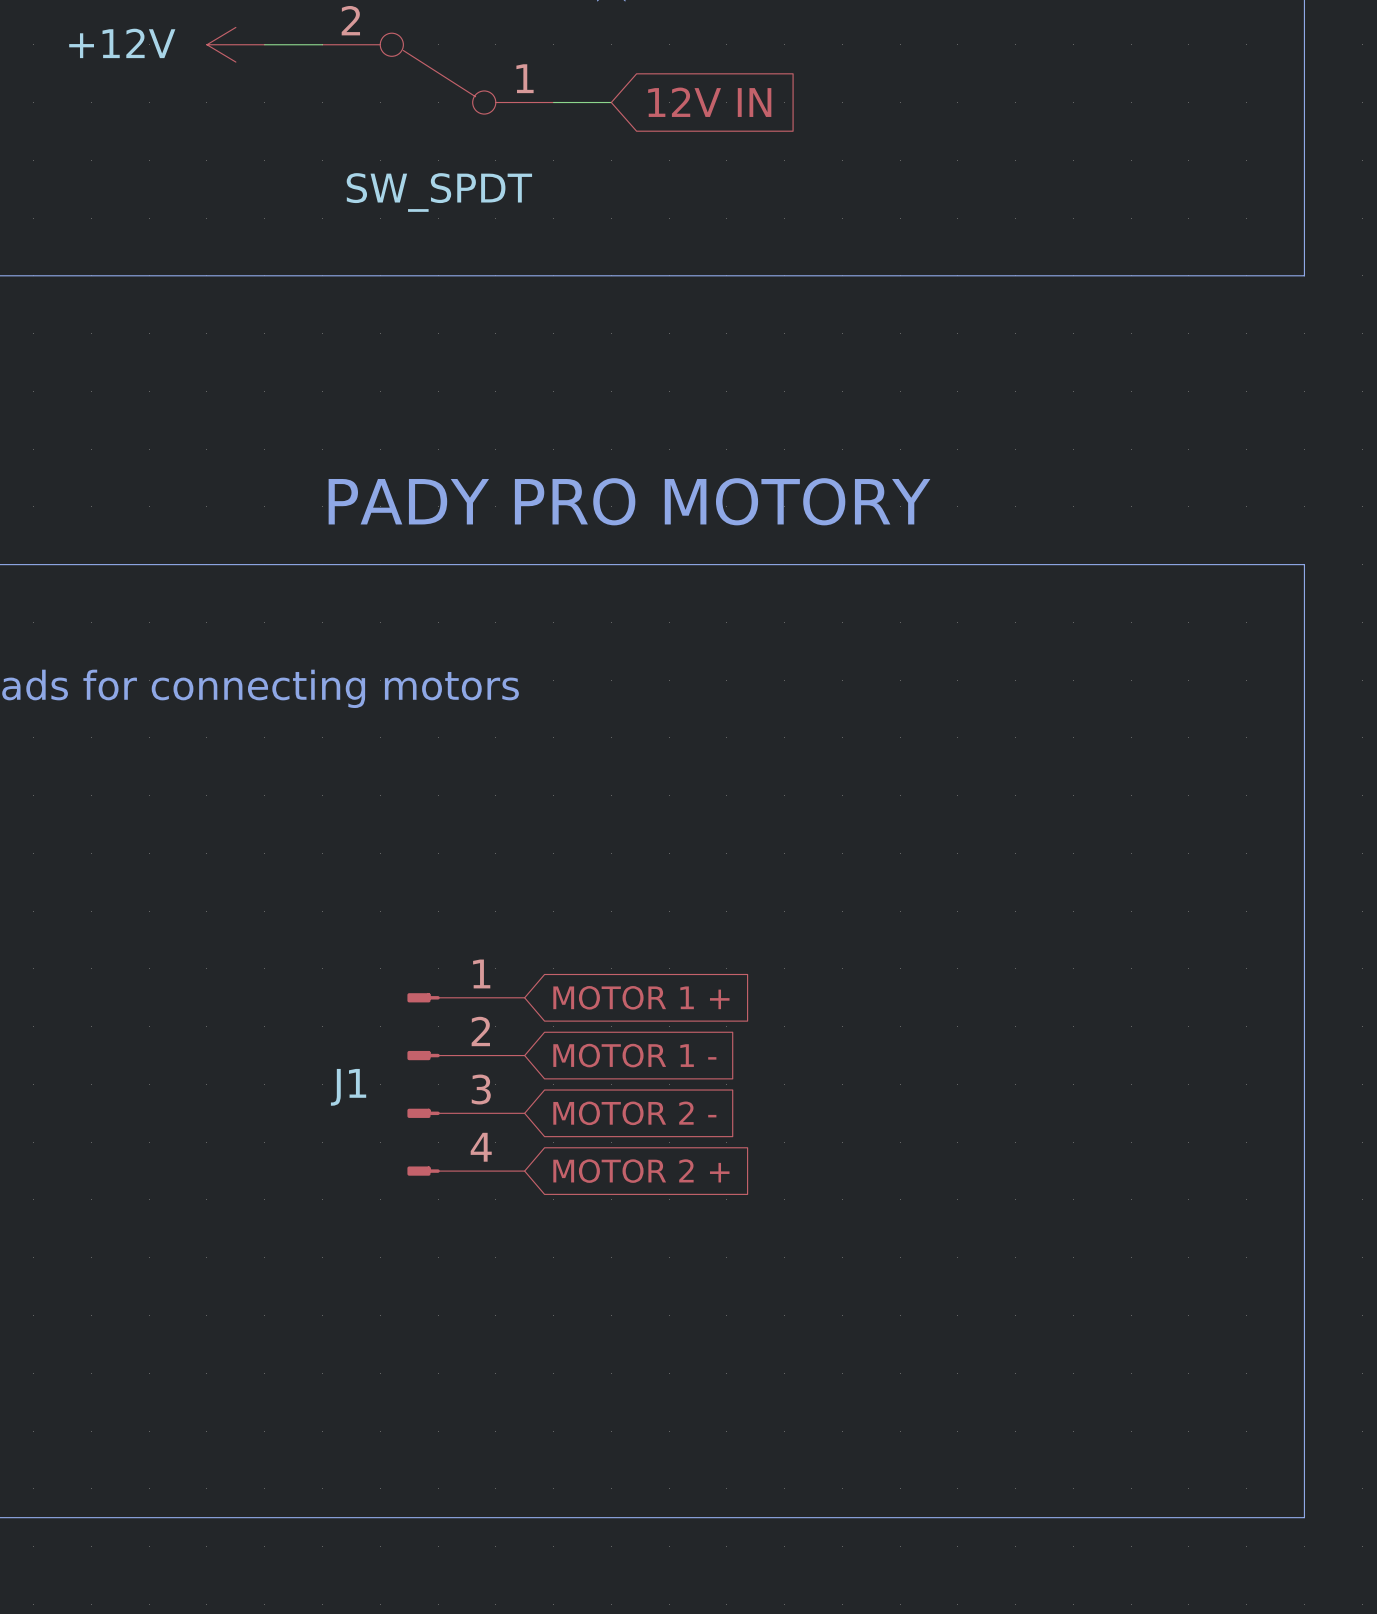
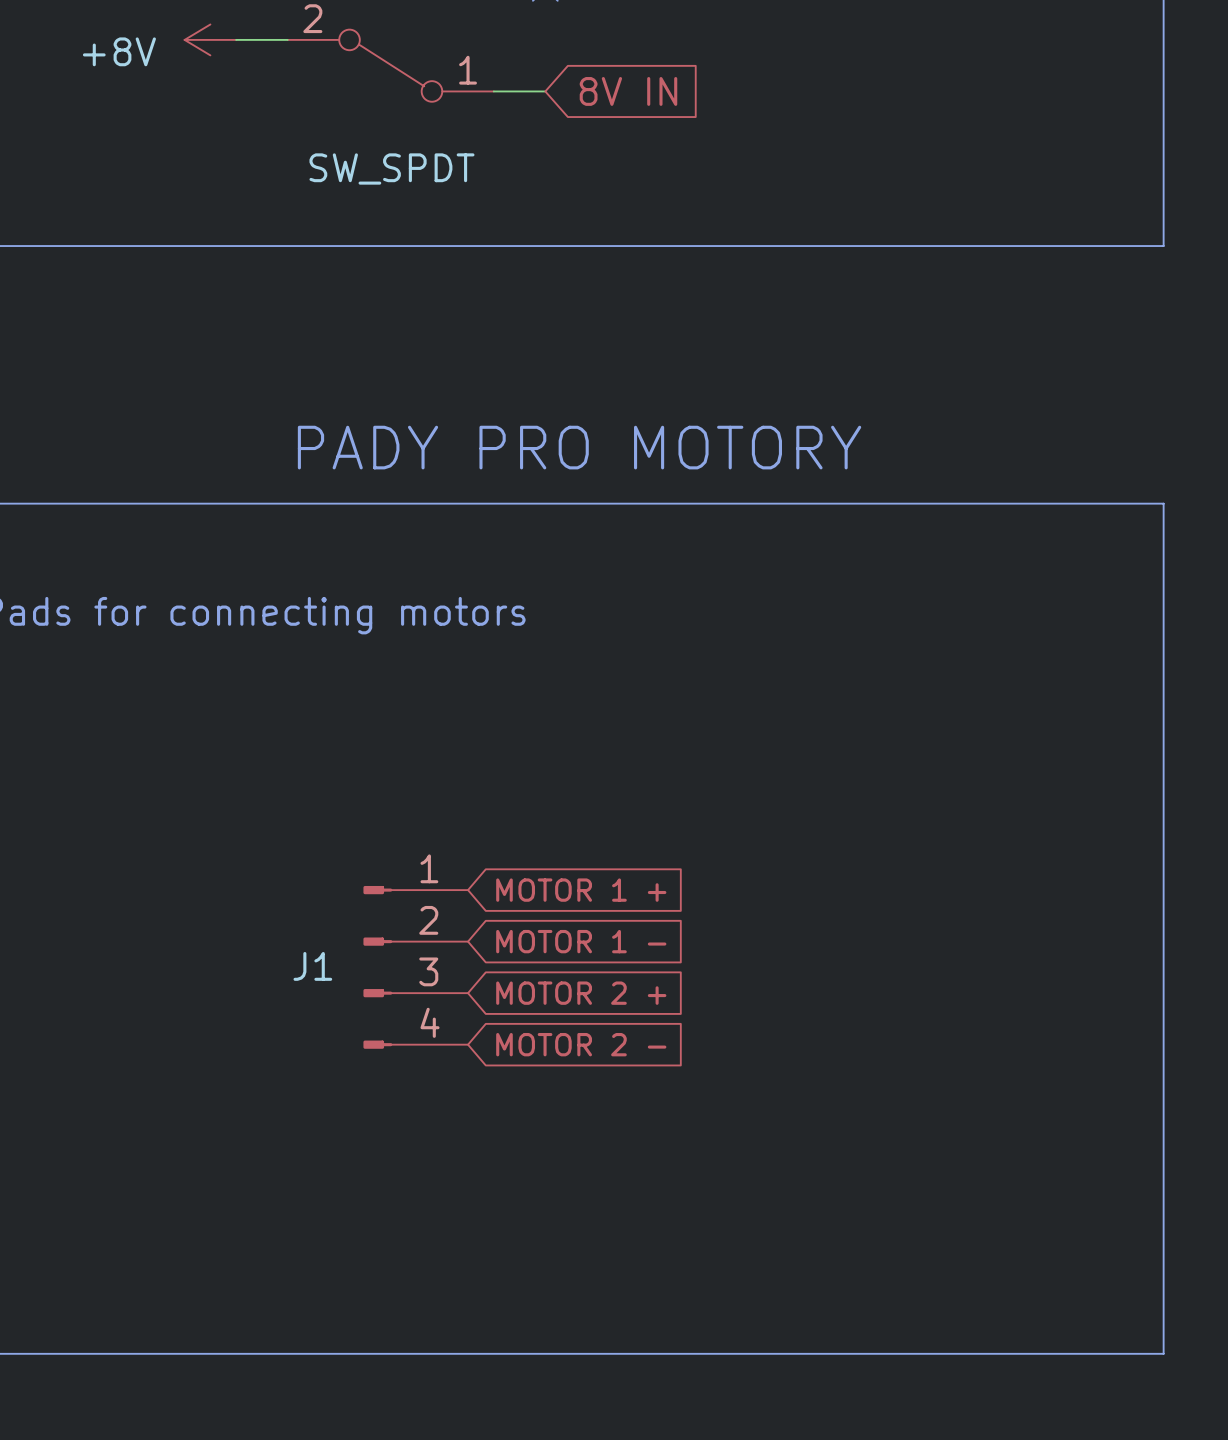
power symbol: +12V (235, 44) -> +8V (210, 39)
global label: 12V IN (709, 102) -> 8V IN (628, 91)
global label: MOTOR 2 - (634, 1113) -> MOTOR 2 + (581, 993)
global label: MOTOR 2 + (641, 1171) -> MOTOR 2 - (581, 1044)

